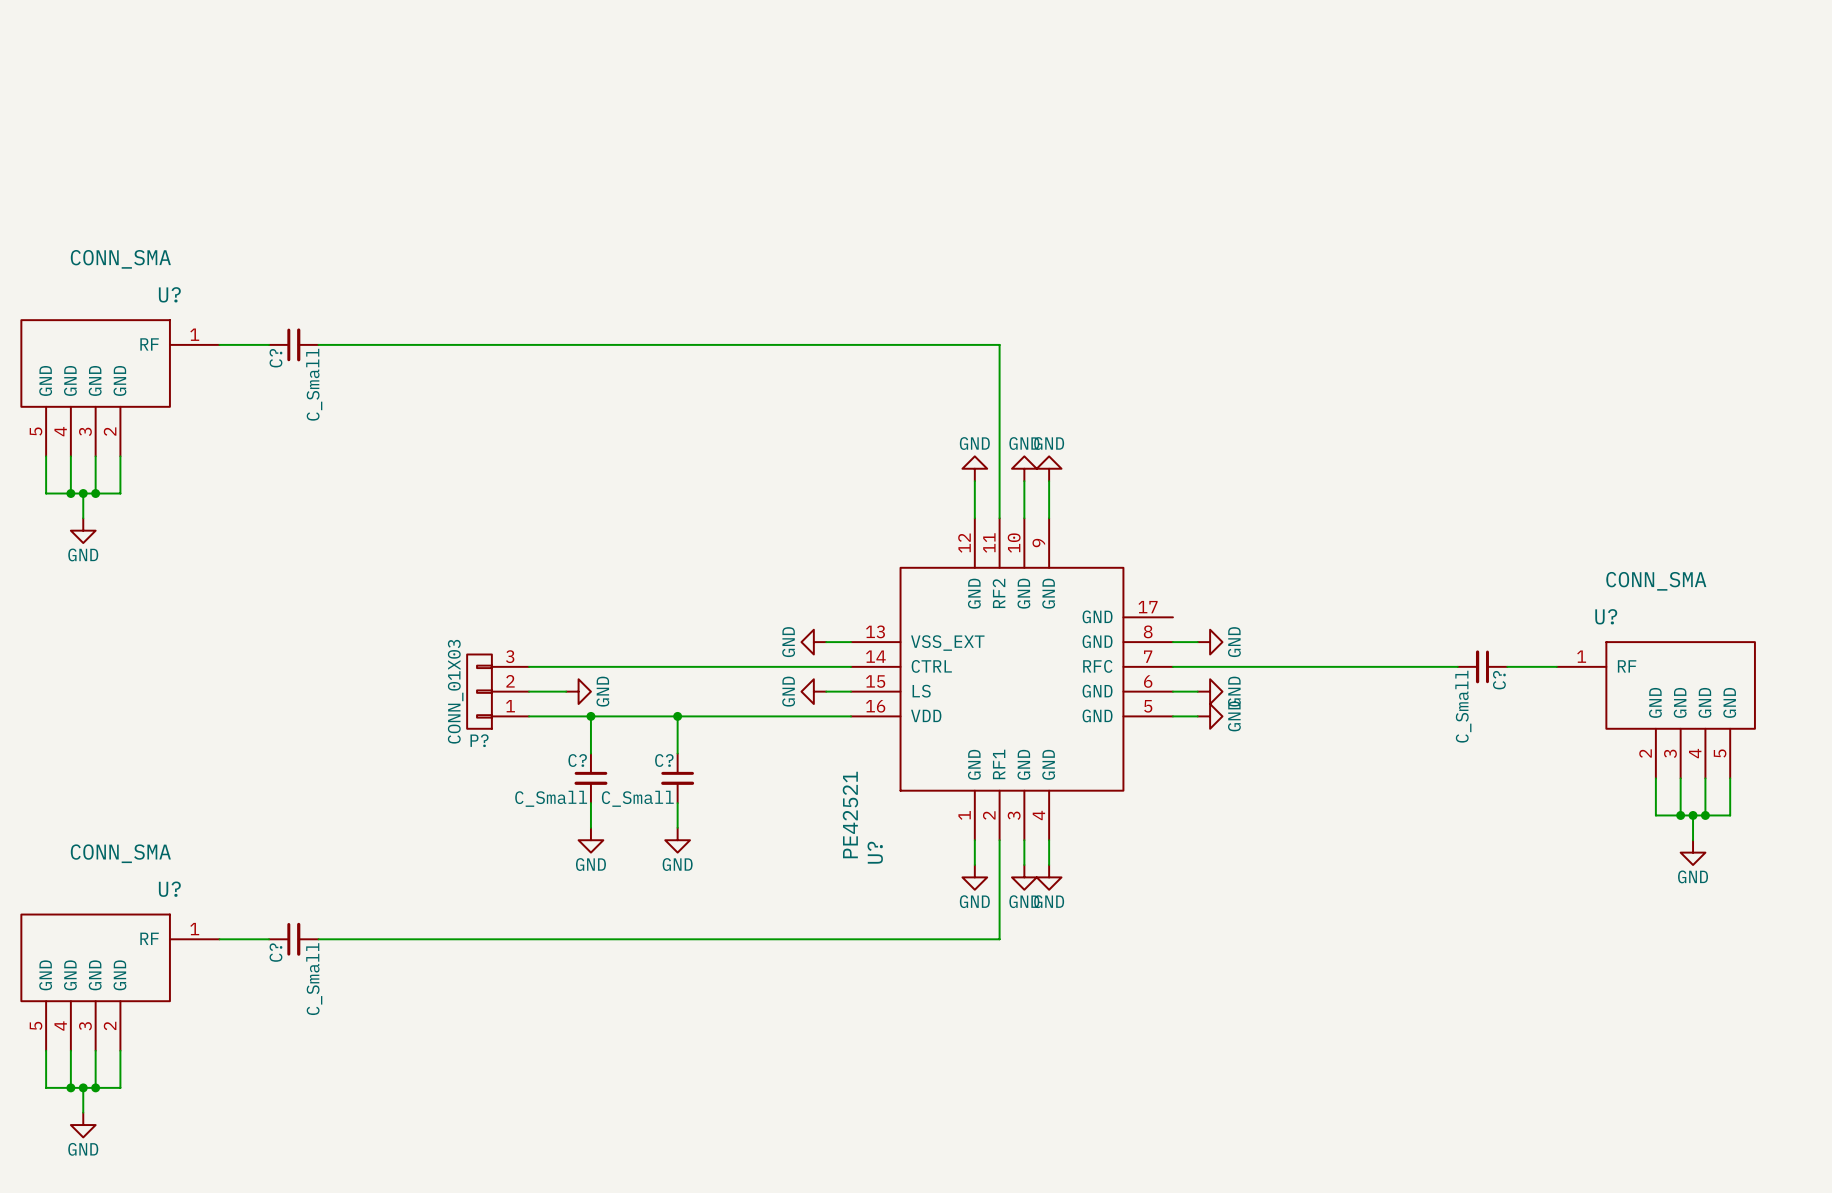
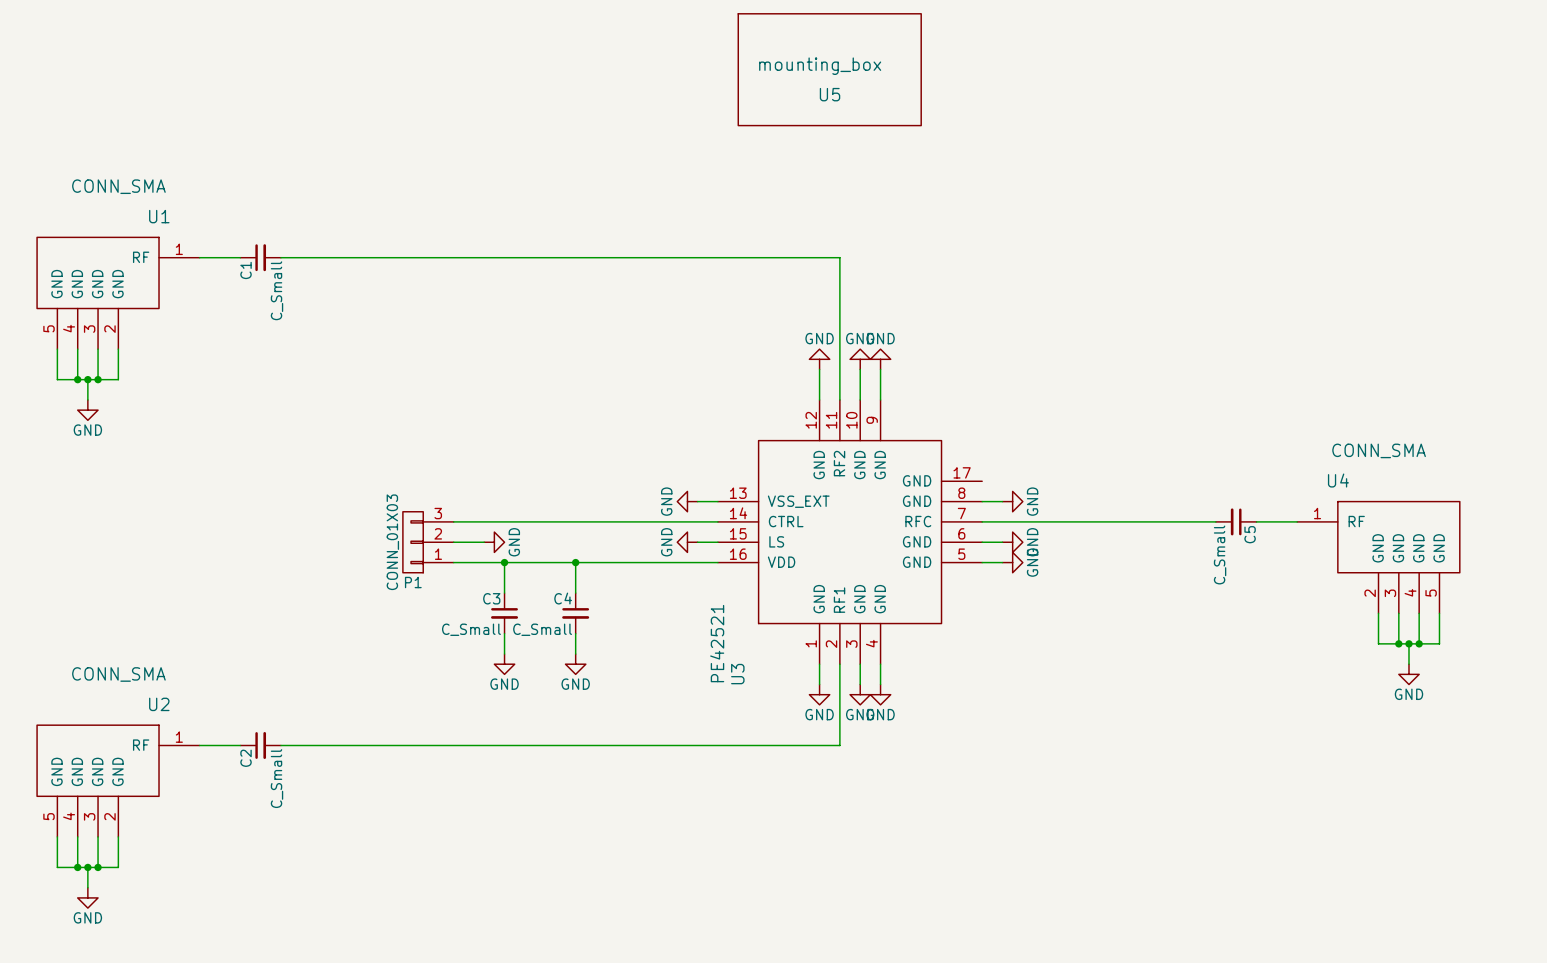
U5: none -> mounting_box (829, 69)
U? name: U? (169, 294) -> U1 (159, 216)
C? name: C? (275, 358) -> C1 (246, 270)
U? name: U? (1606, 616) -> U4 (1338, 480)
C? name: C? (1499, 680) -> C5 (1250, 534)
P? name: P? (479, 740) -> P1 (413, 582)
C? name: C? (577, 760) -> C3 (491, 598)
C? name: C? (664, 760) -> C4 (563, 598)
U? name: U? (875, 852) -> U3 (737, 674)
U? name: U? (169, 889) -> U2 (159, 704)
C? name: C? (275, 952) -> C2 (246, 758)

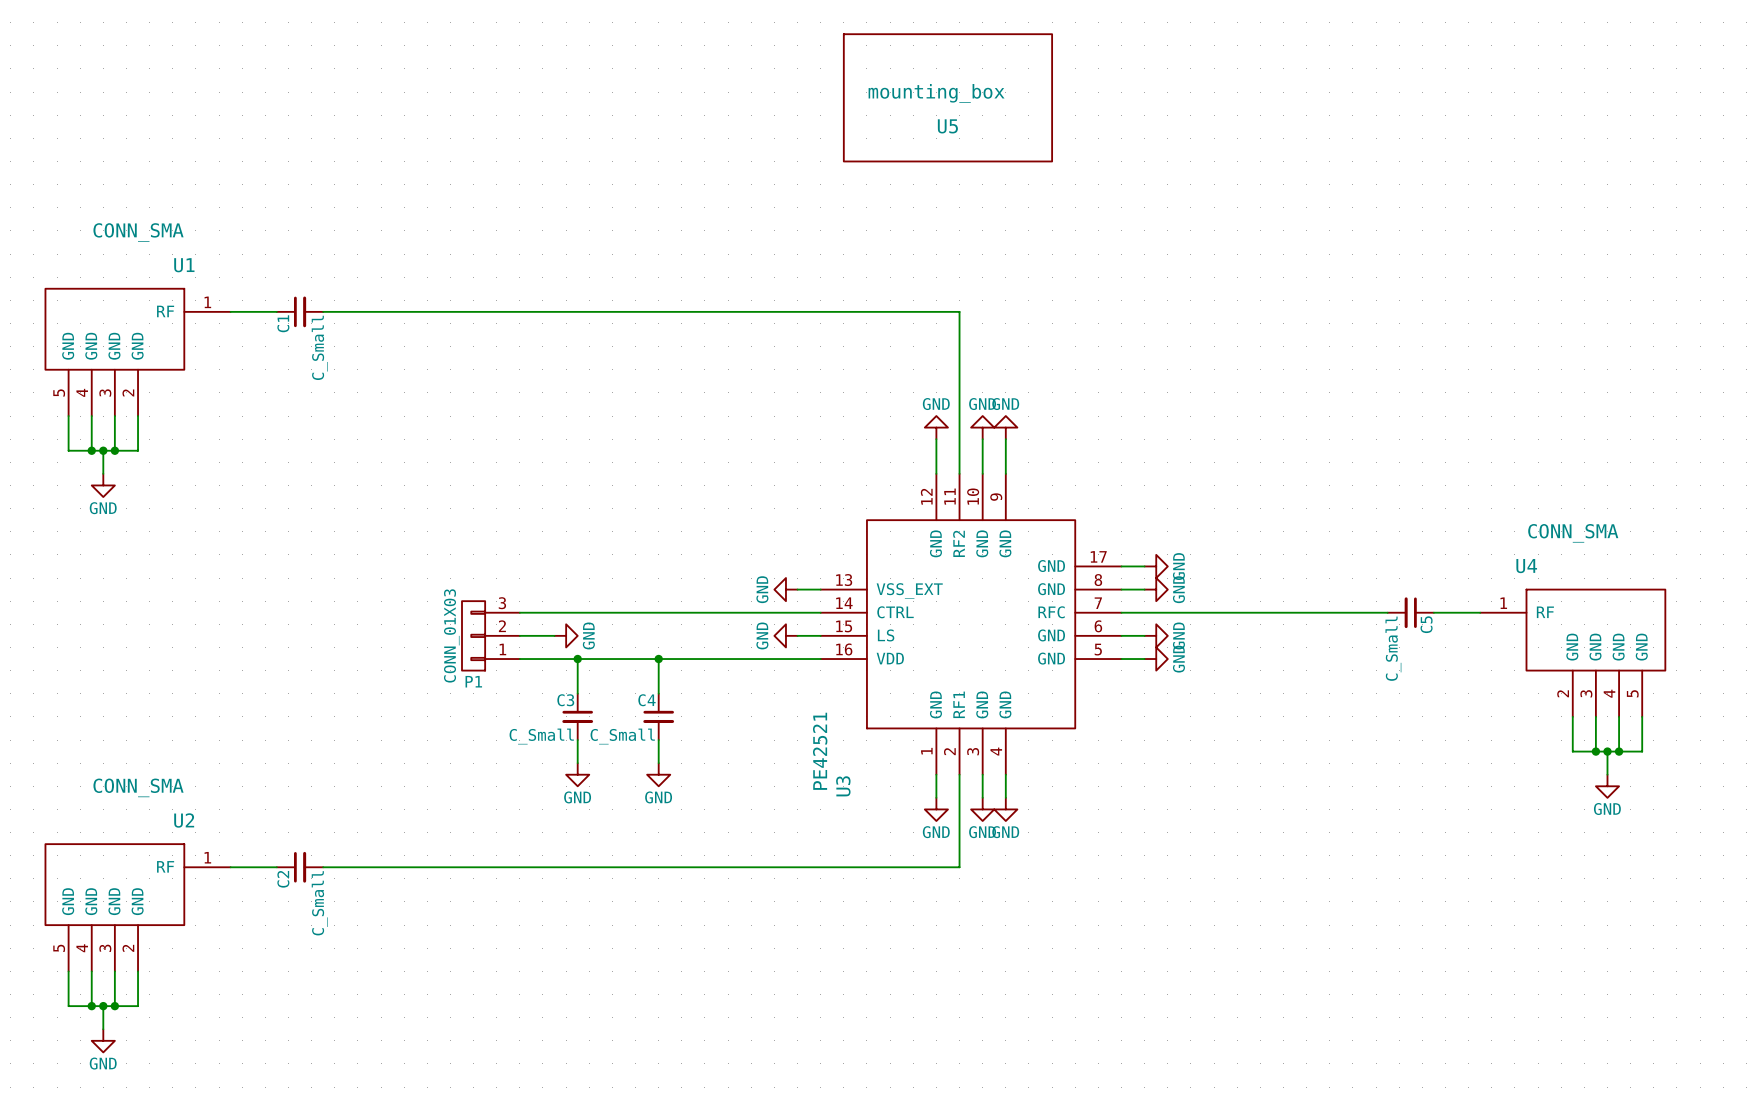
wire: none -> (1121, 566) (1144, 566)
power symbol: none -> GND (1156, 566)

